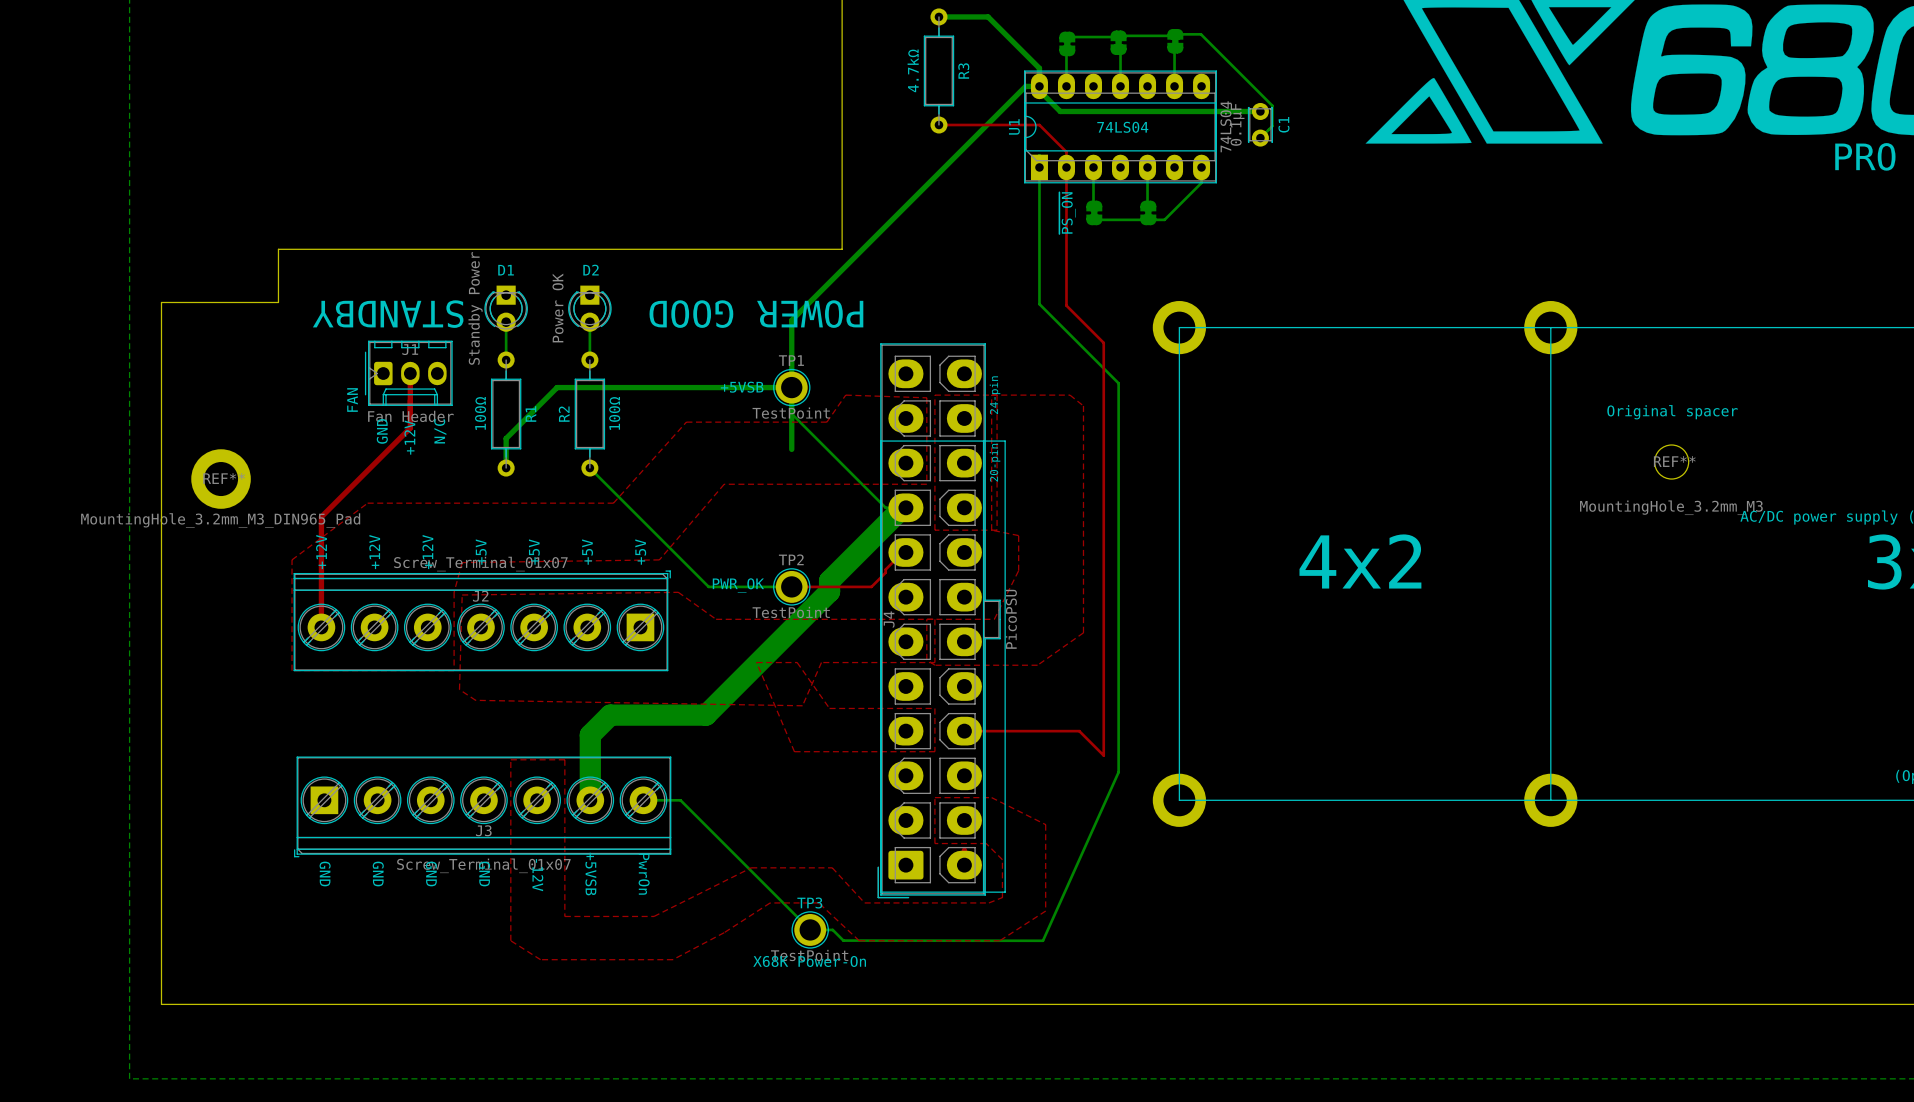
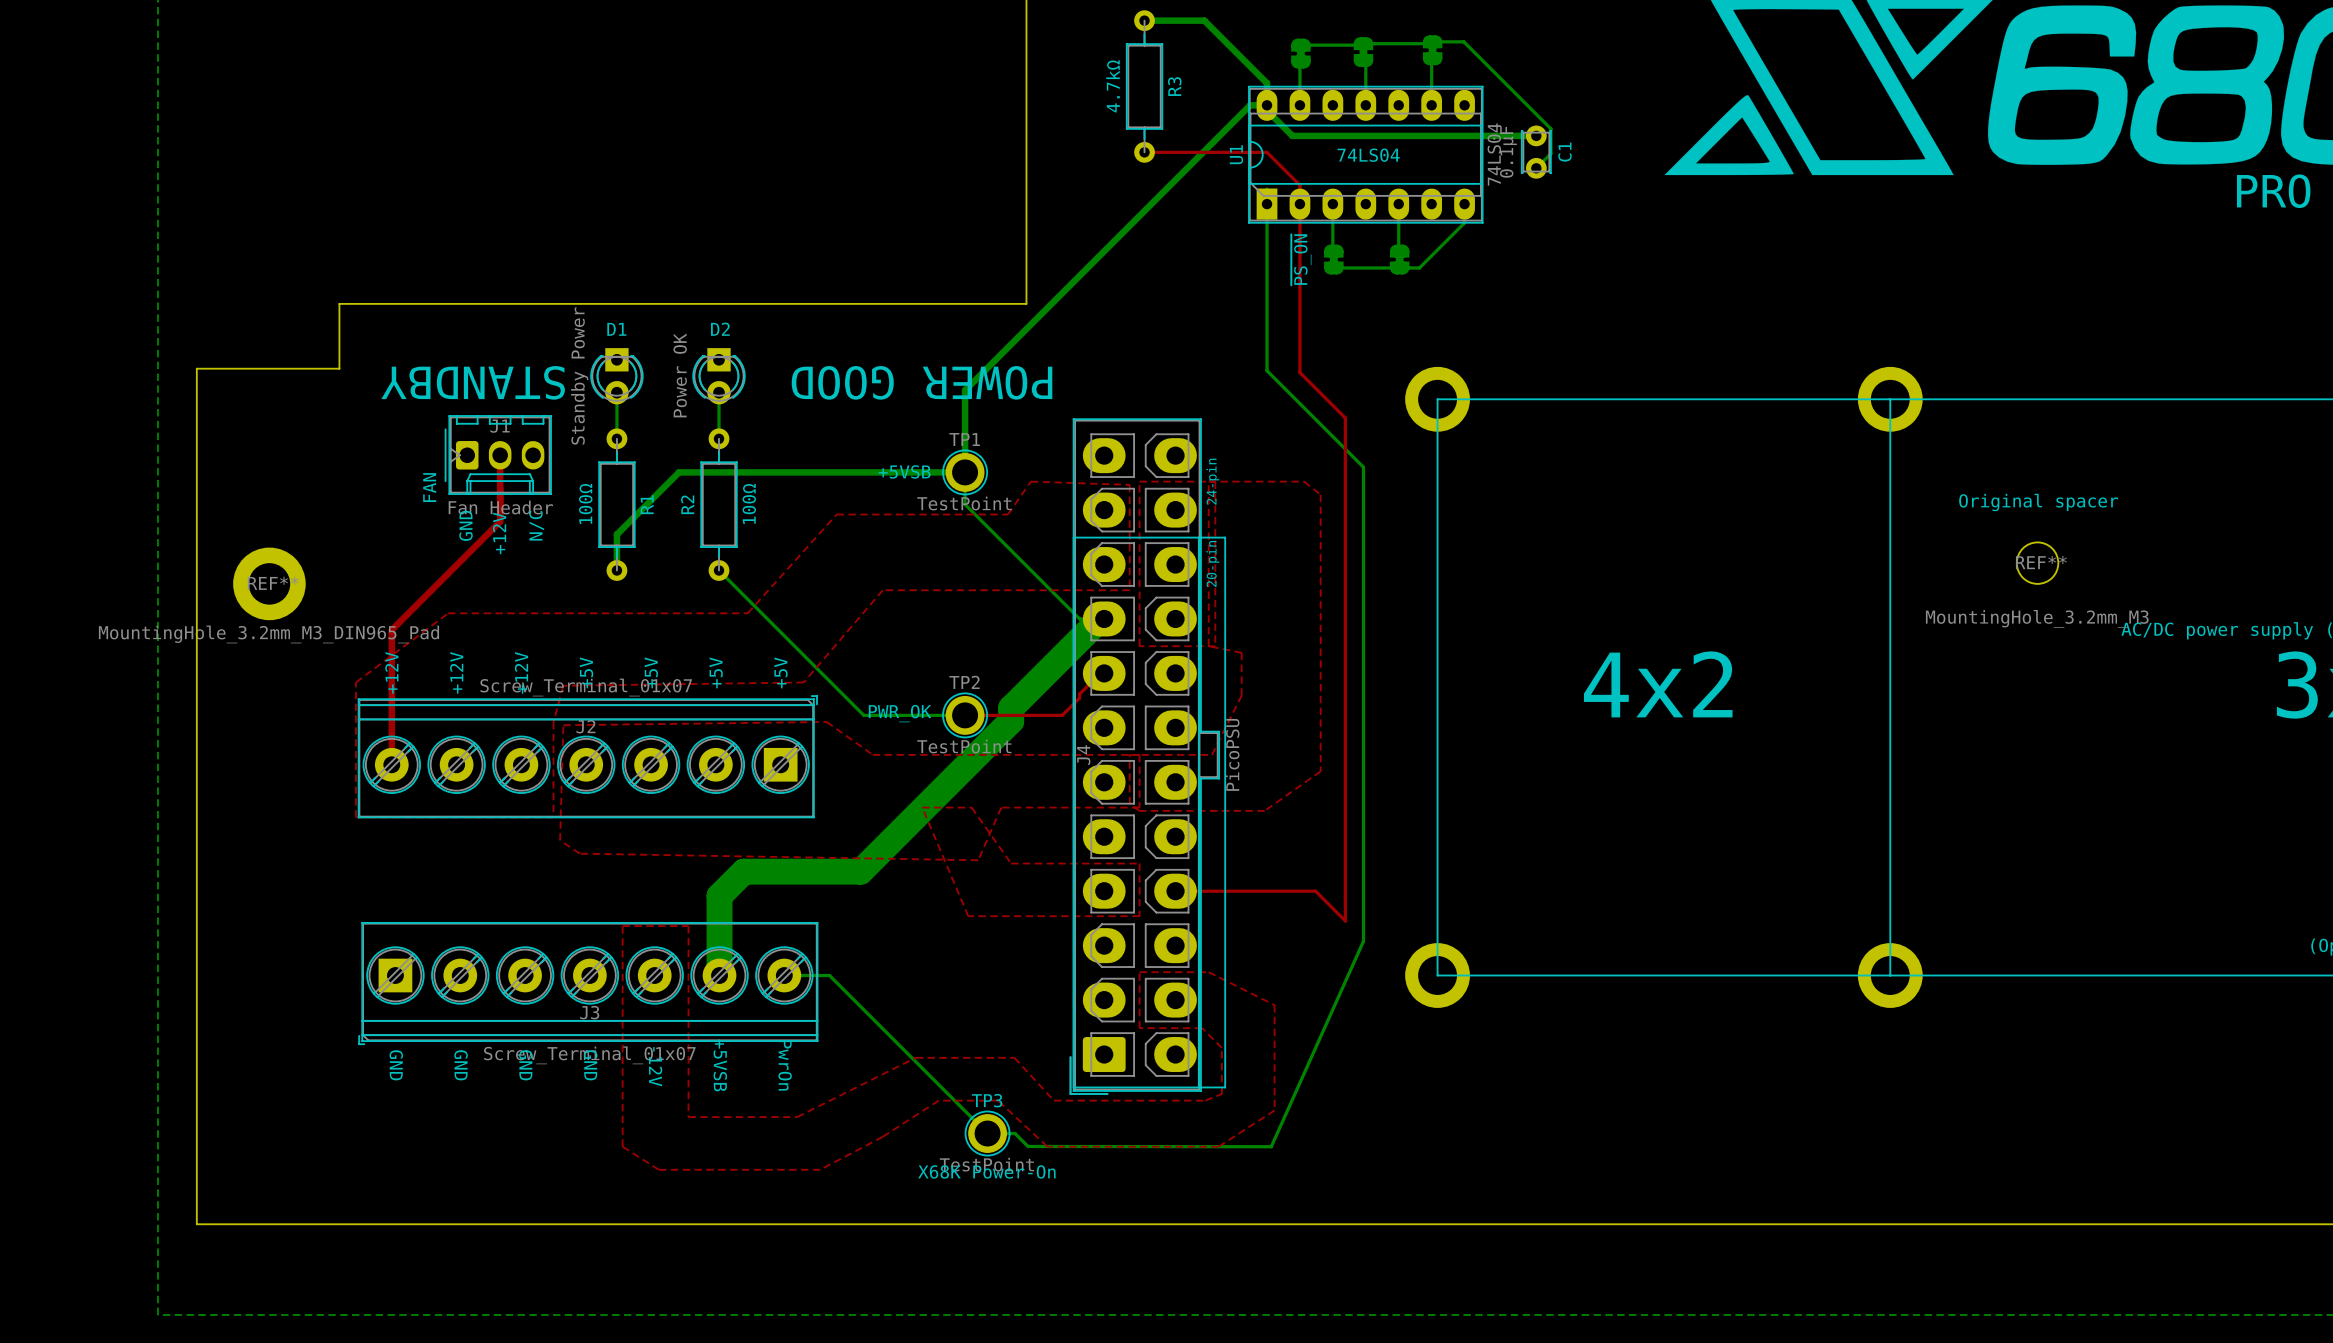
bottom track: (791, 387) (791, 449) -> none
top track: (964, 850) (964, 853) -> none

